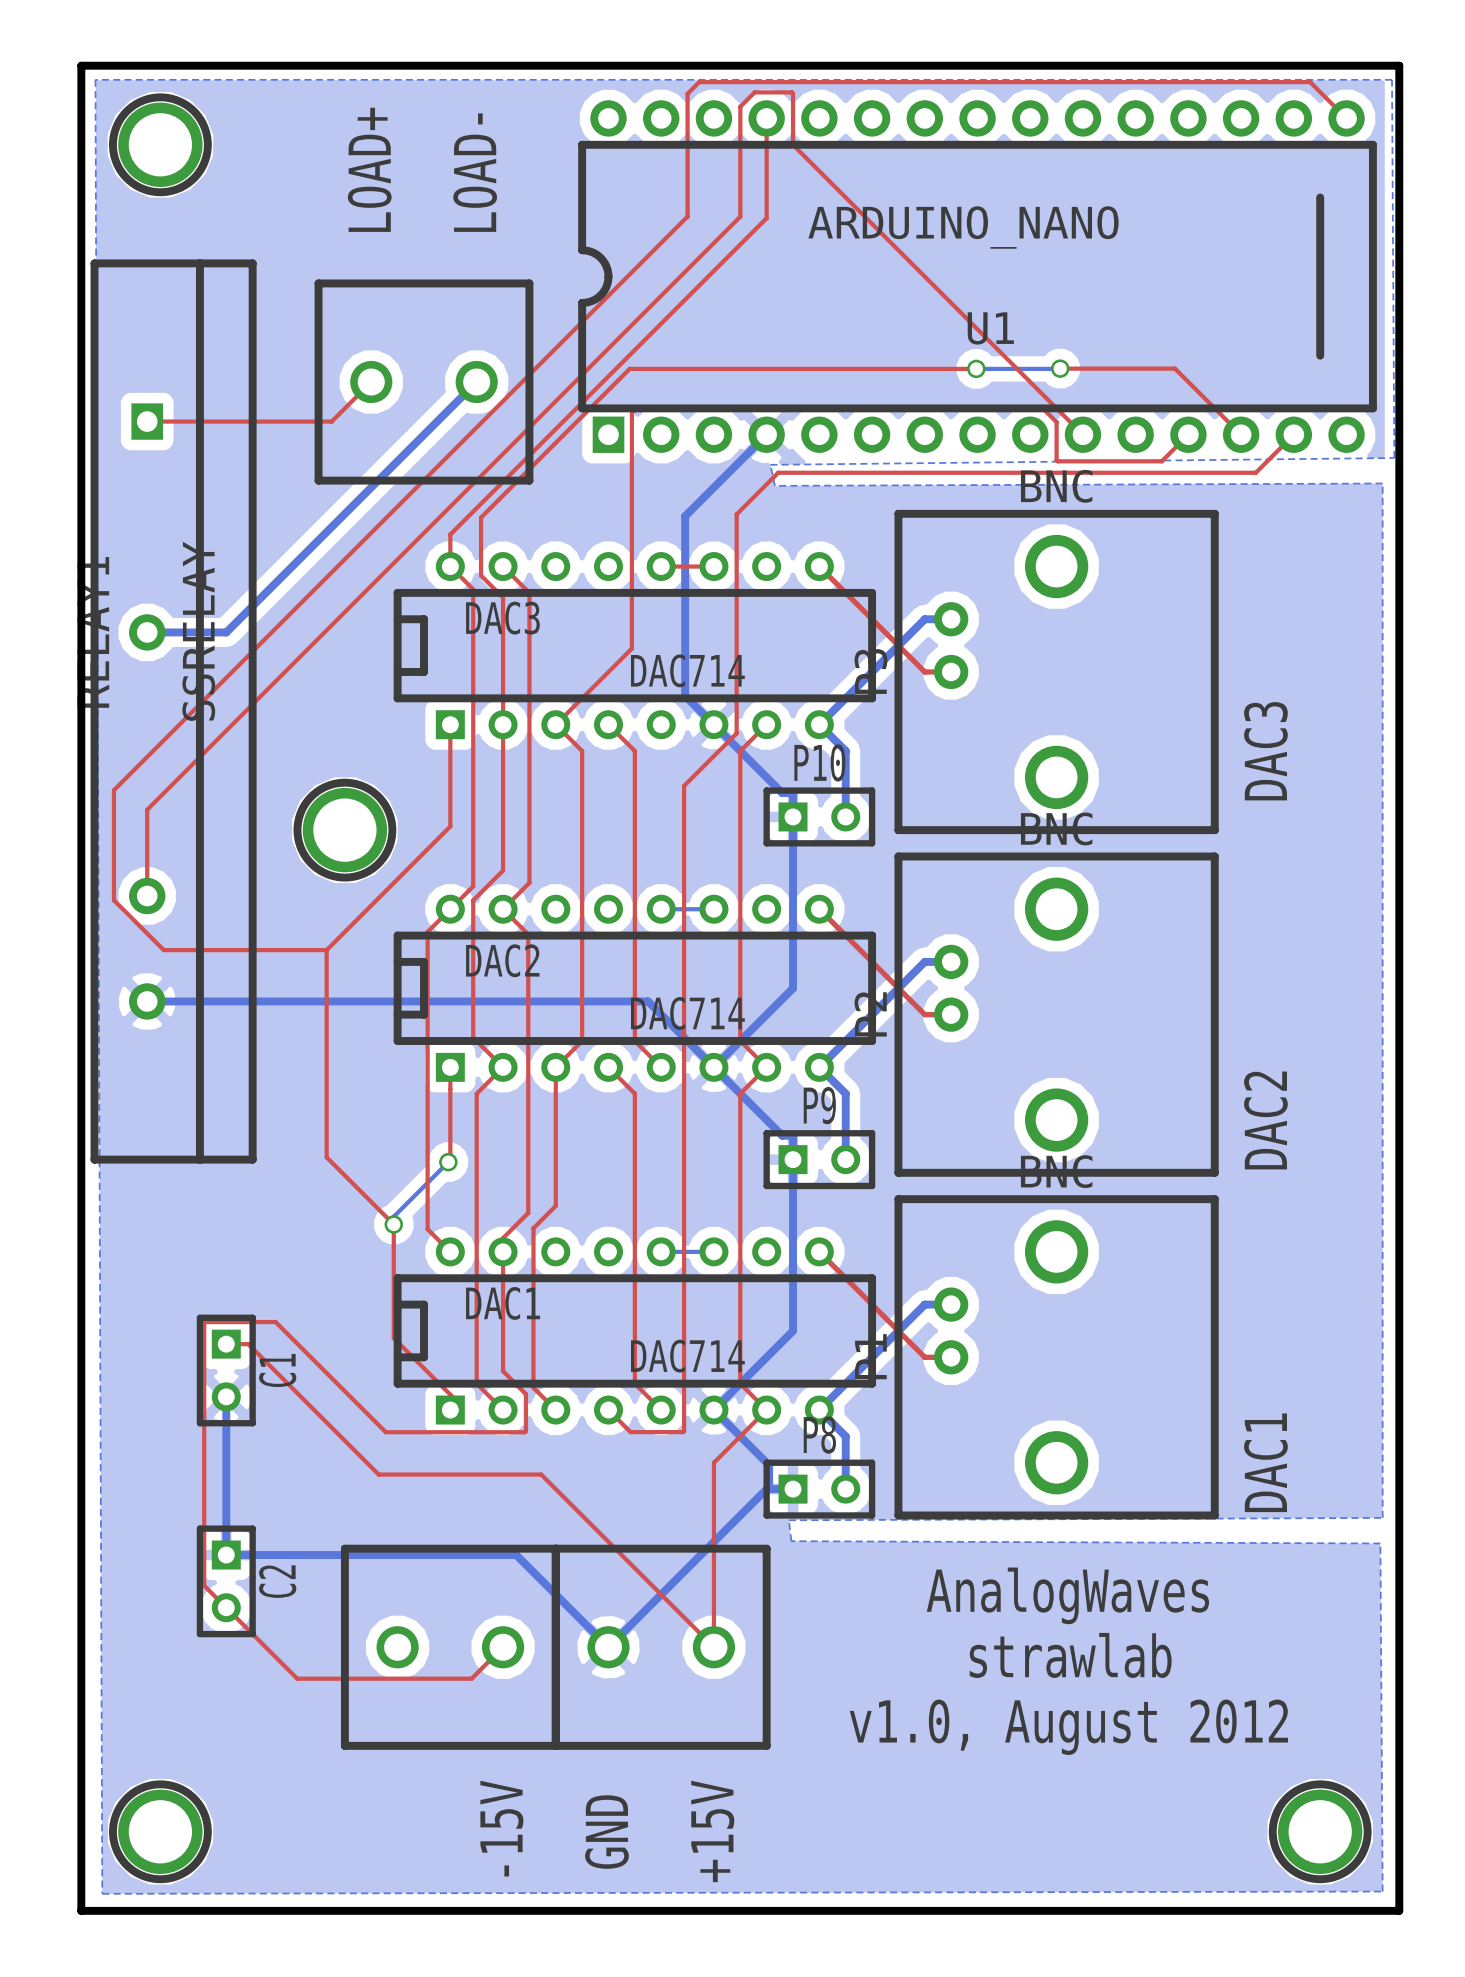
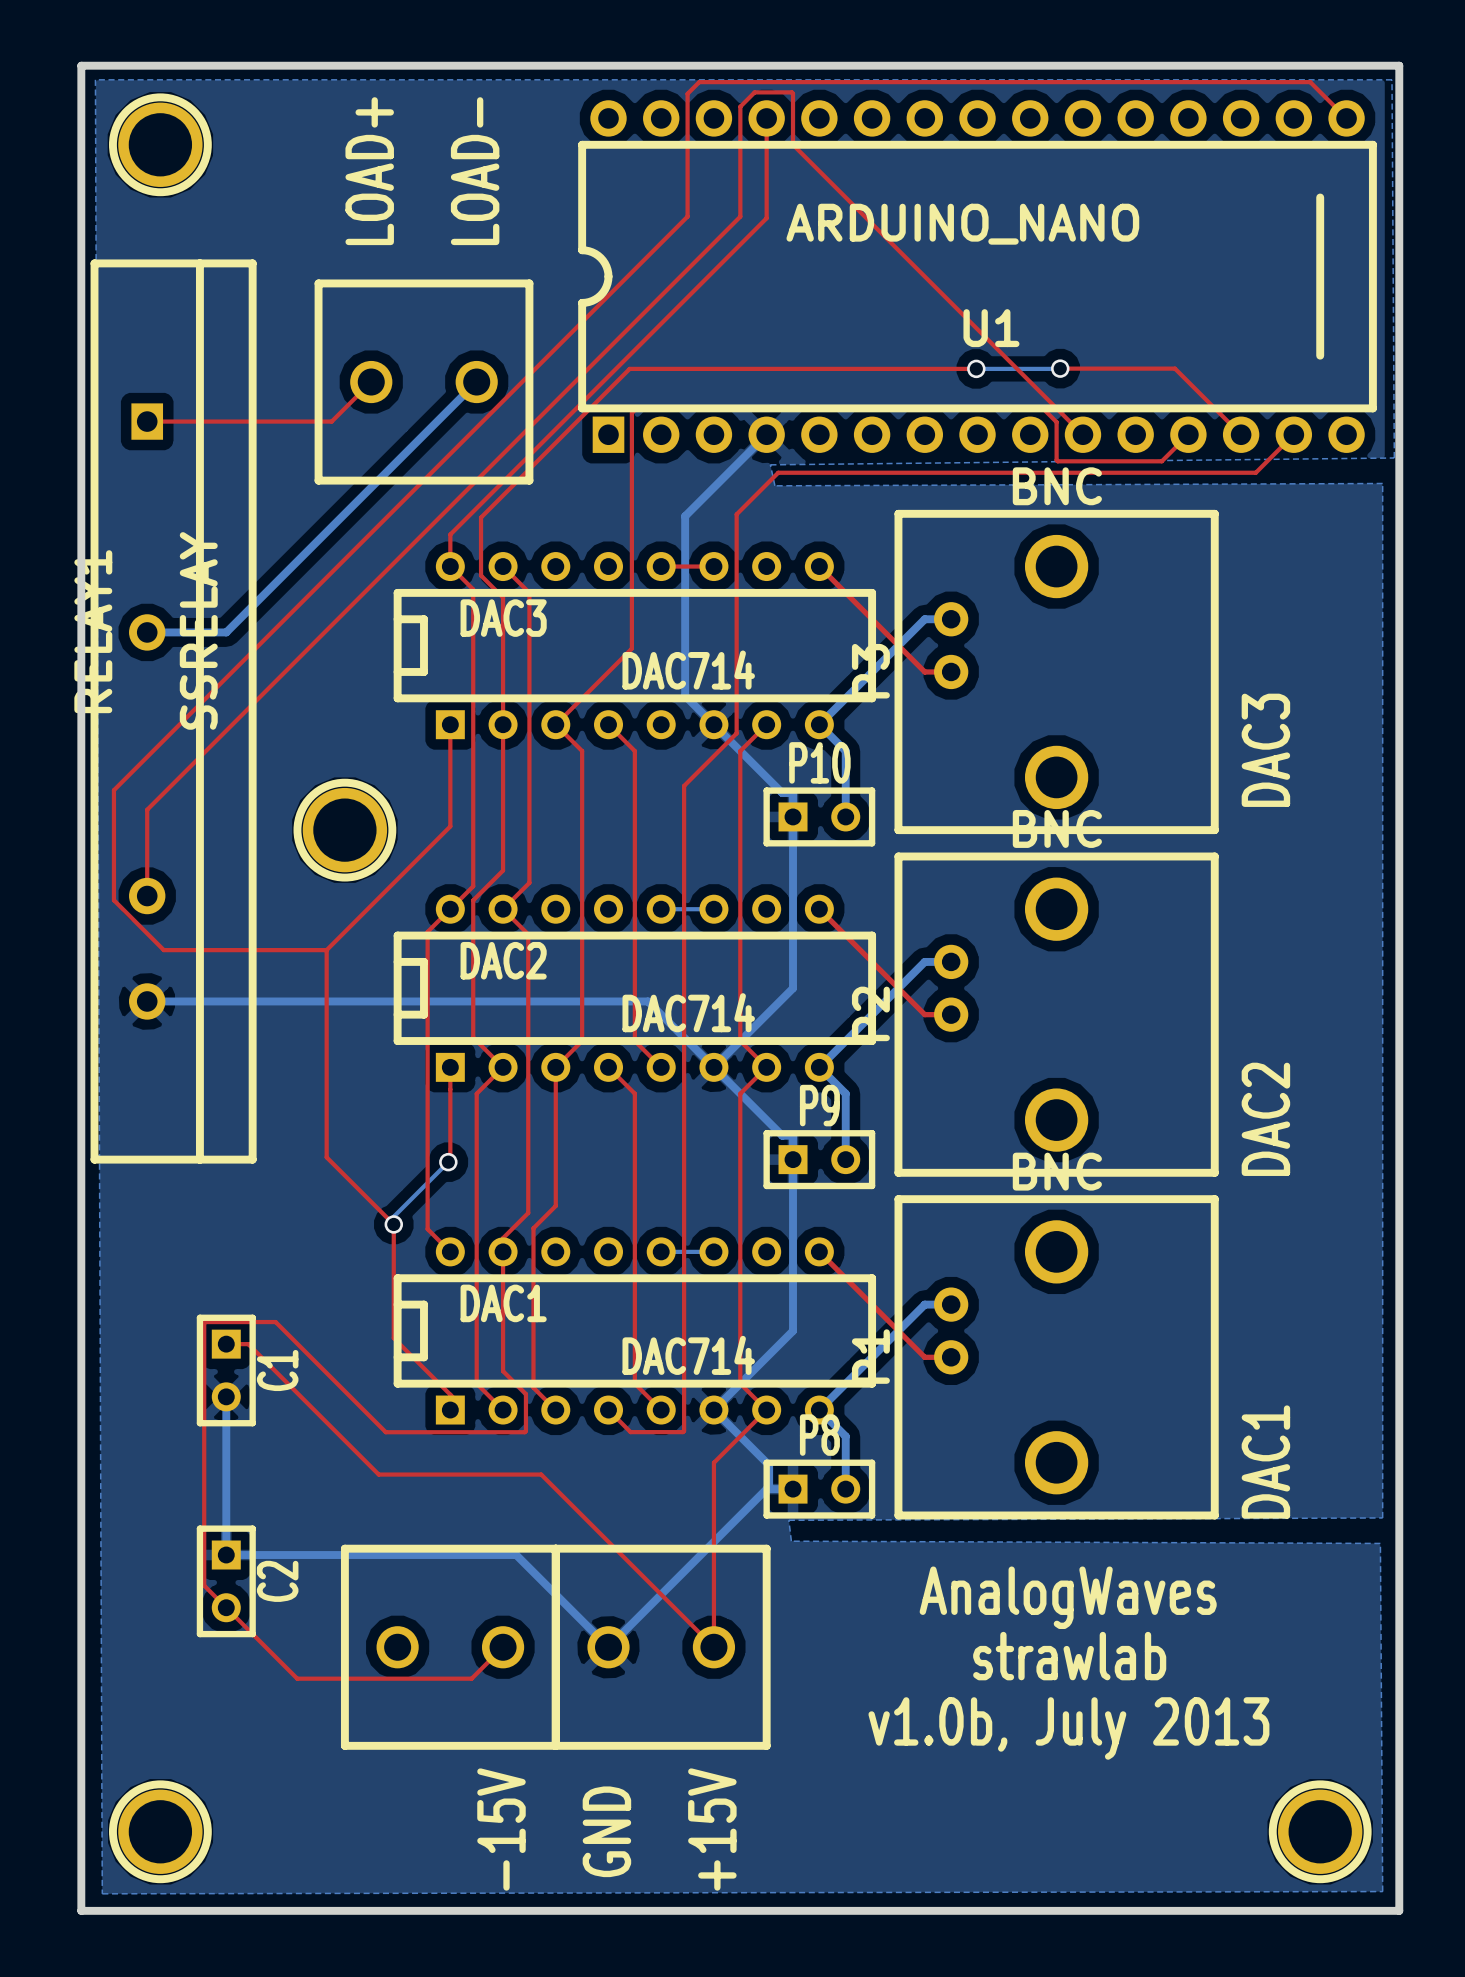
text: v1.0, August 2012 (1068, 1727) -> v1.0b, July 2013 (1068, 1728)

